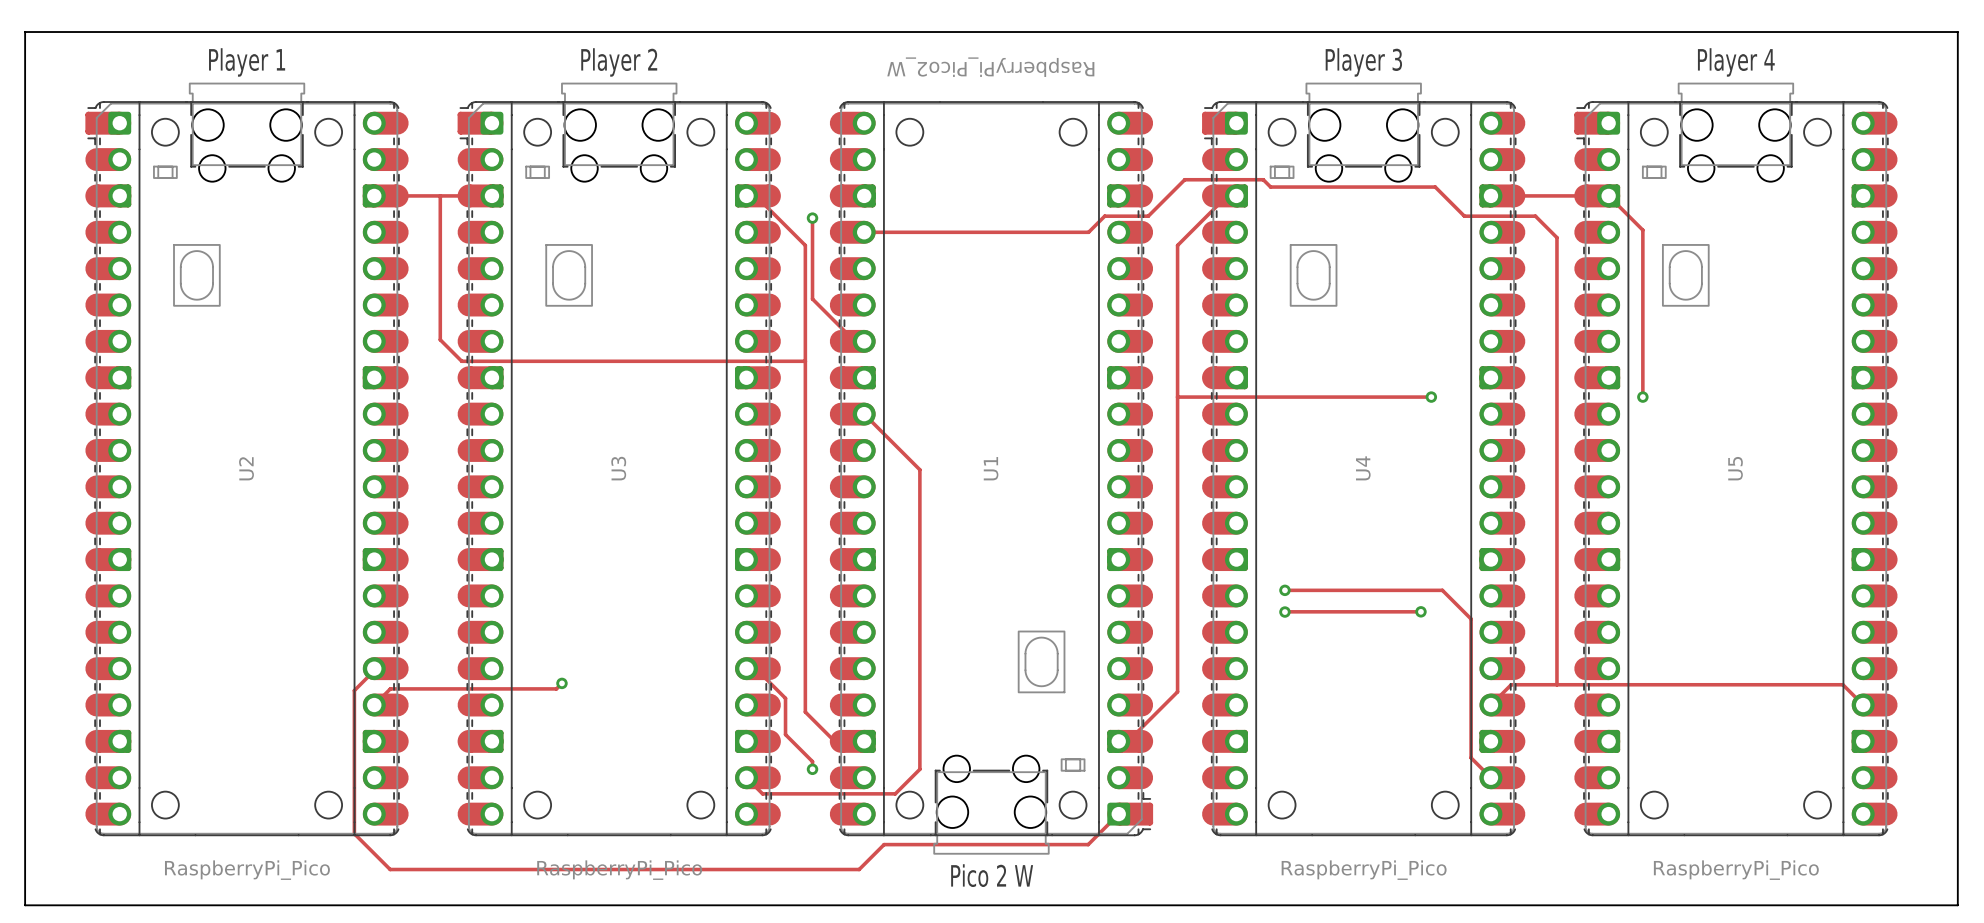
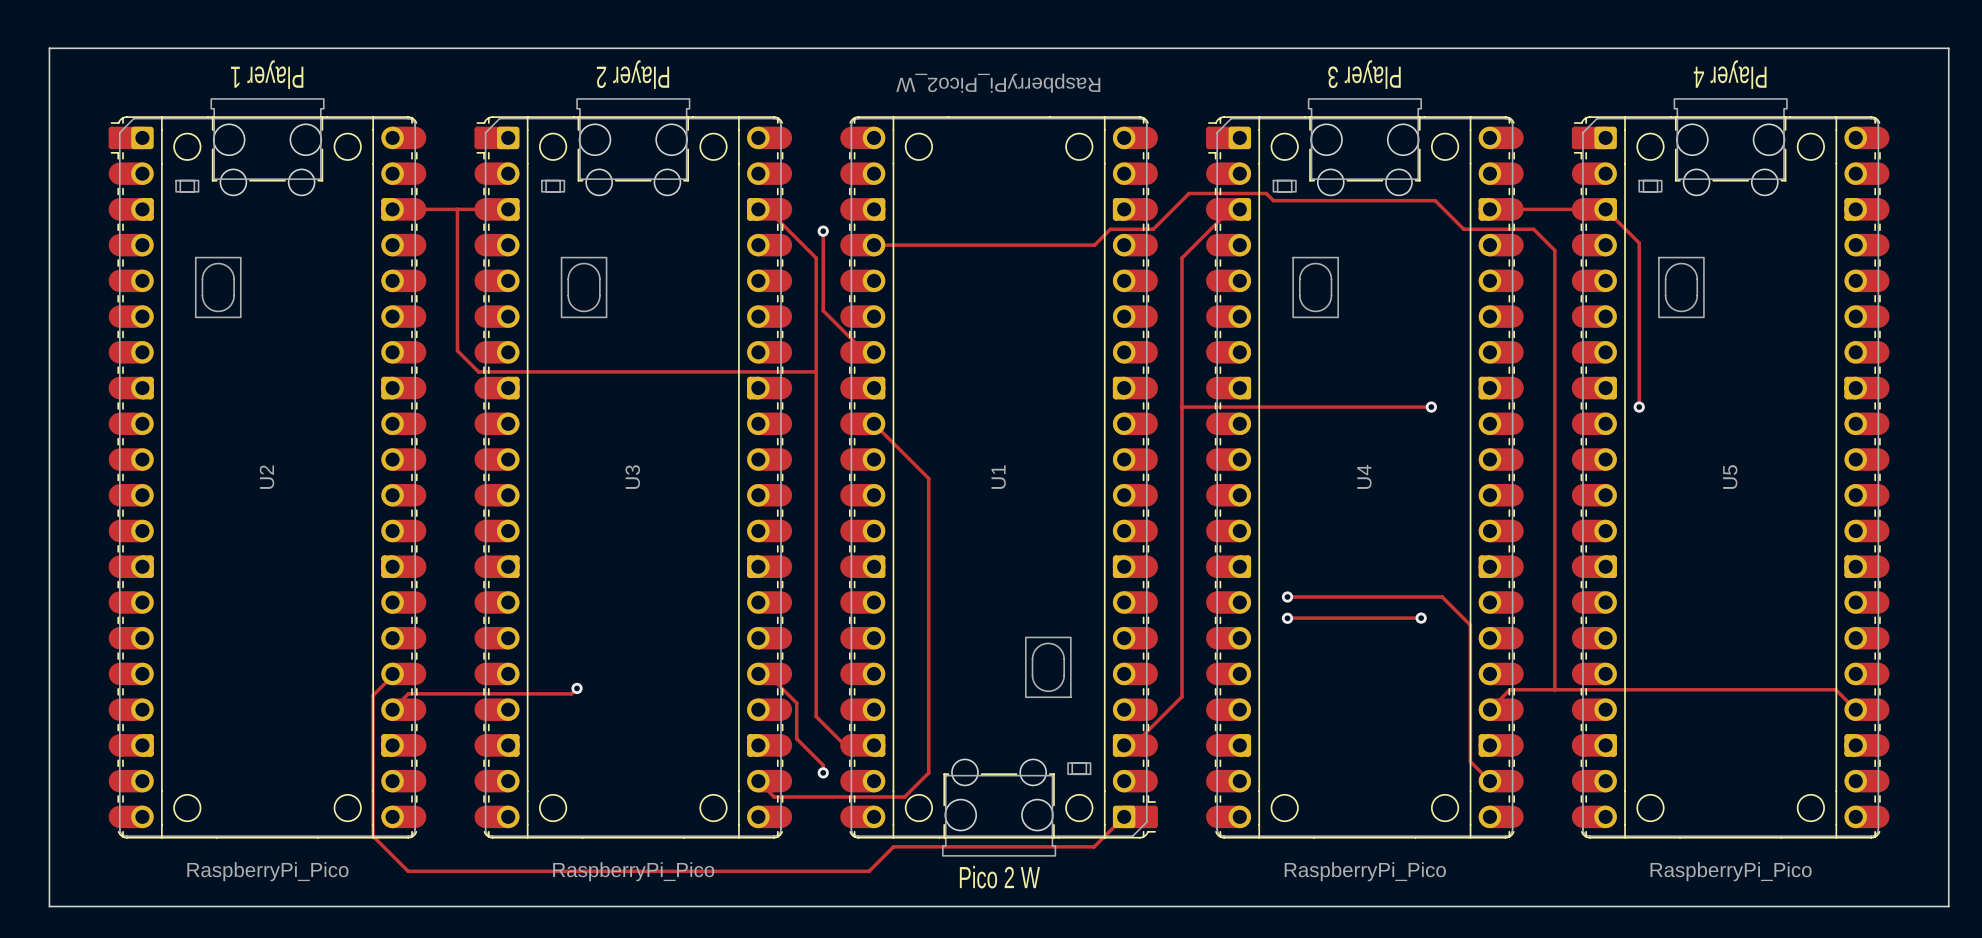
text rotation: 0° (247, 62) -> 180° (267, 74)
text rotation: 0° (619, 62) -> 180° (632, 74)
text rotation: 0° (1363, 62) -> 180° (1364, 74)
text rotation: 0° (1736, 62) -> 180° (1730, 74)

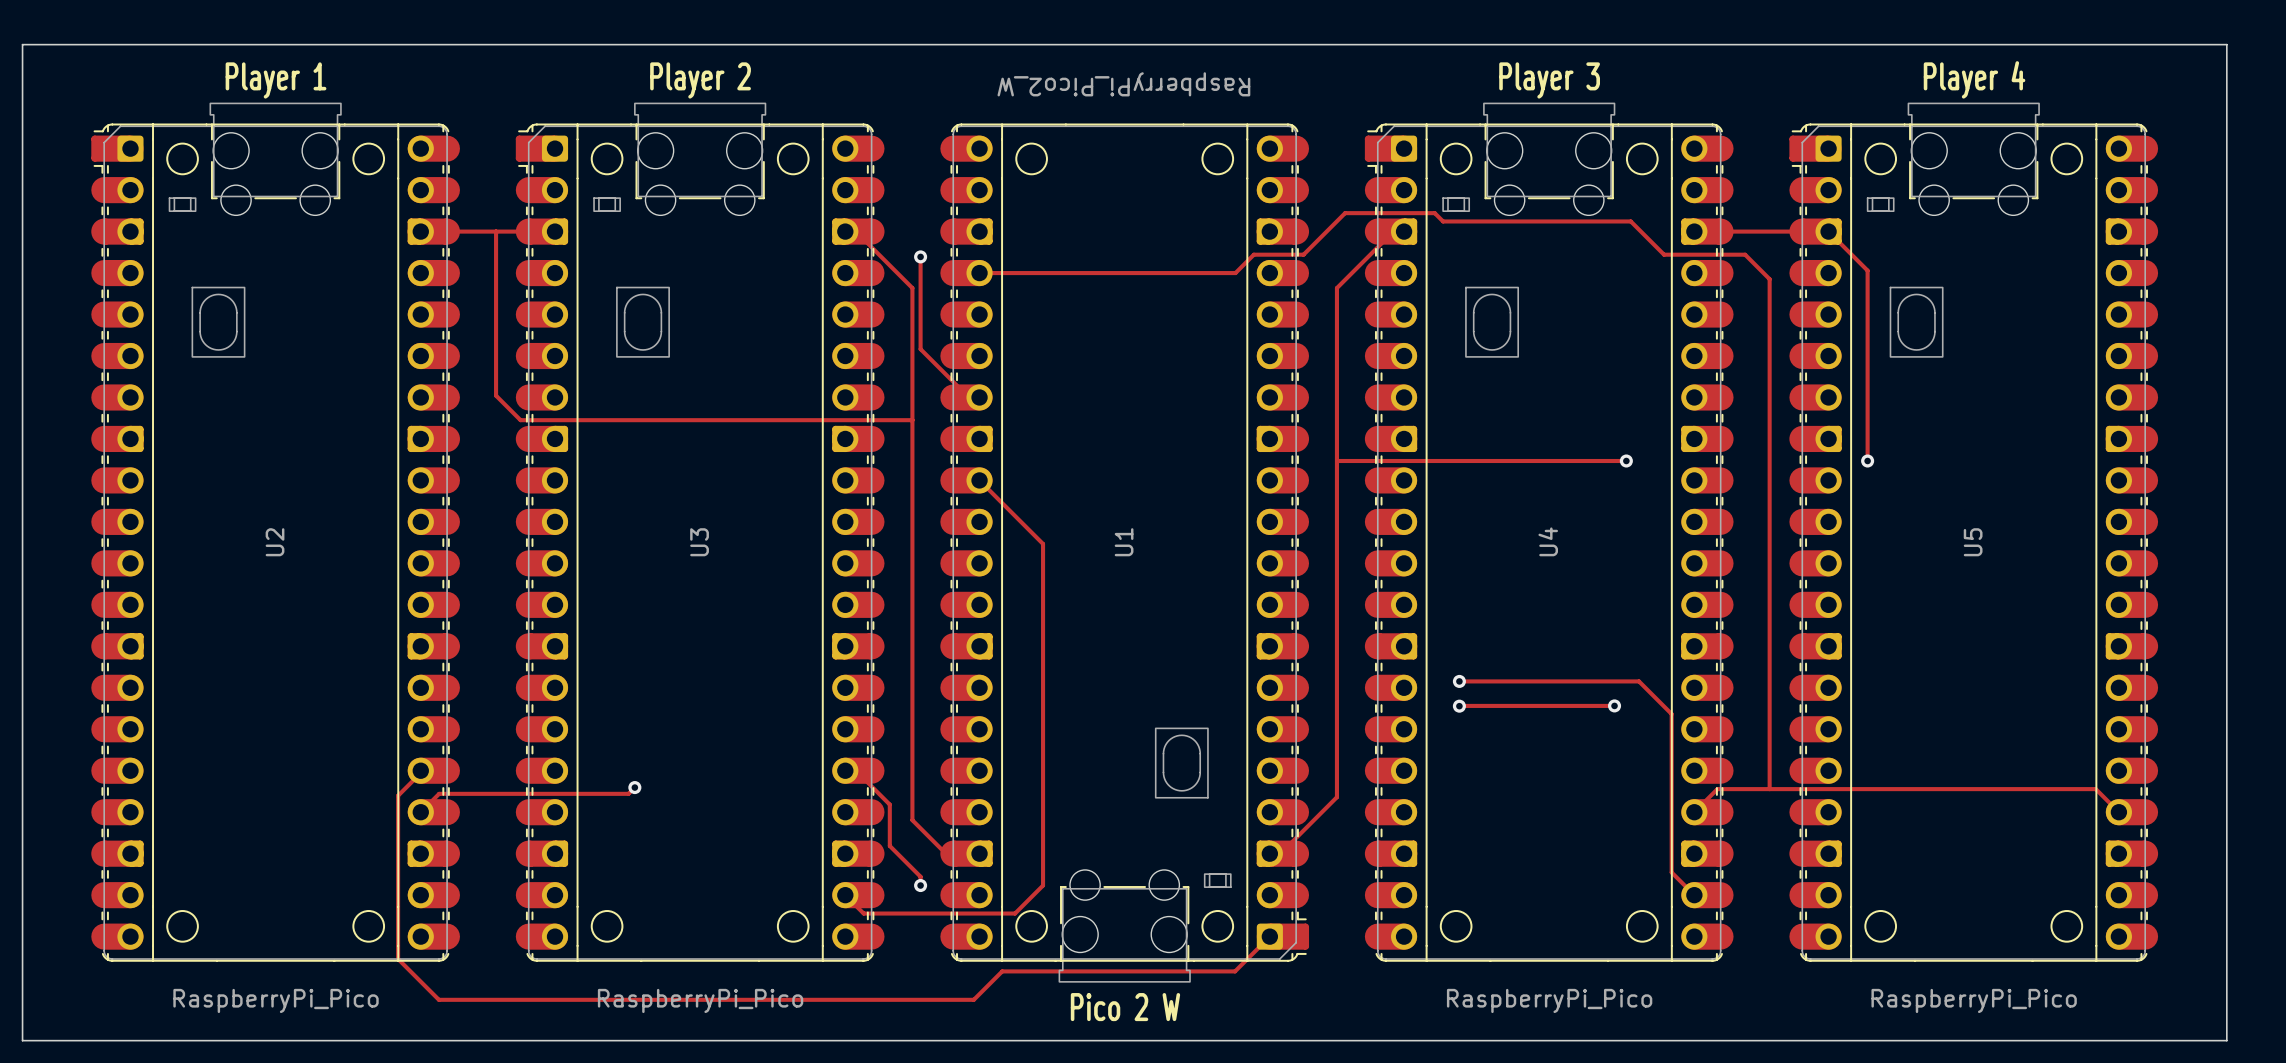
text rotation: 0° (267, 74) -> 180° (276, 80)
text rotation: 0° (632, 74) -> 180° (700, 80)
text rotation: 0° (1364, 74) -> 180° (1549, 80)
text rotation: 0° (1730, 74) -> 180° (1974, 79)

